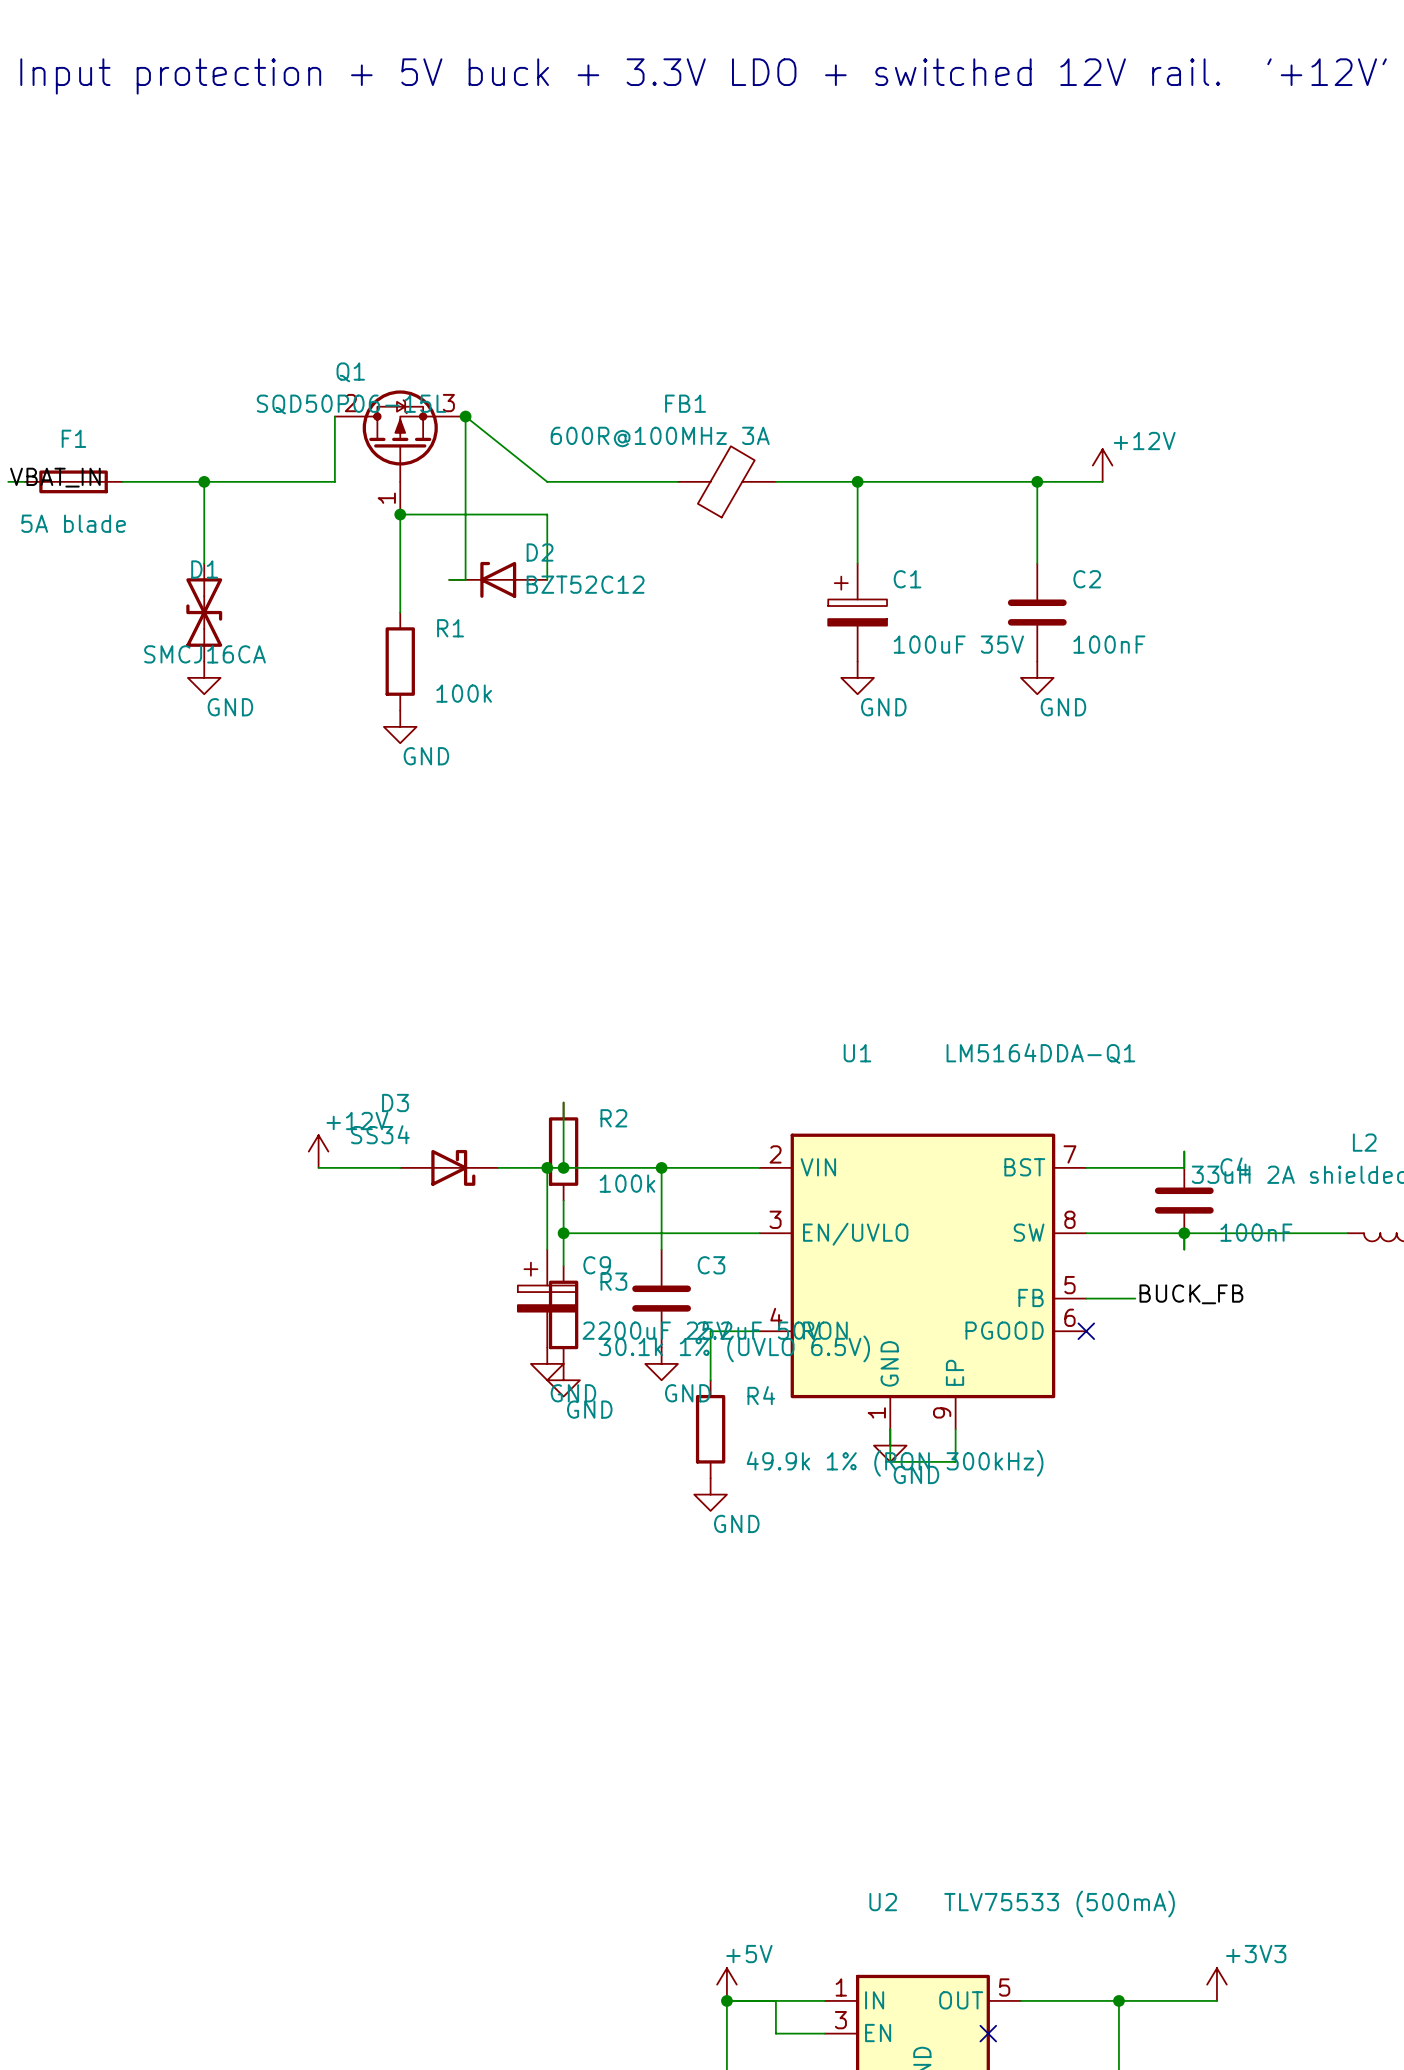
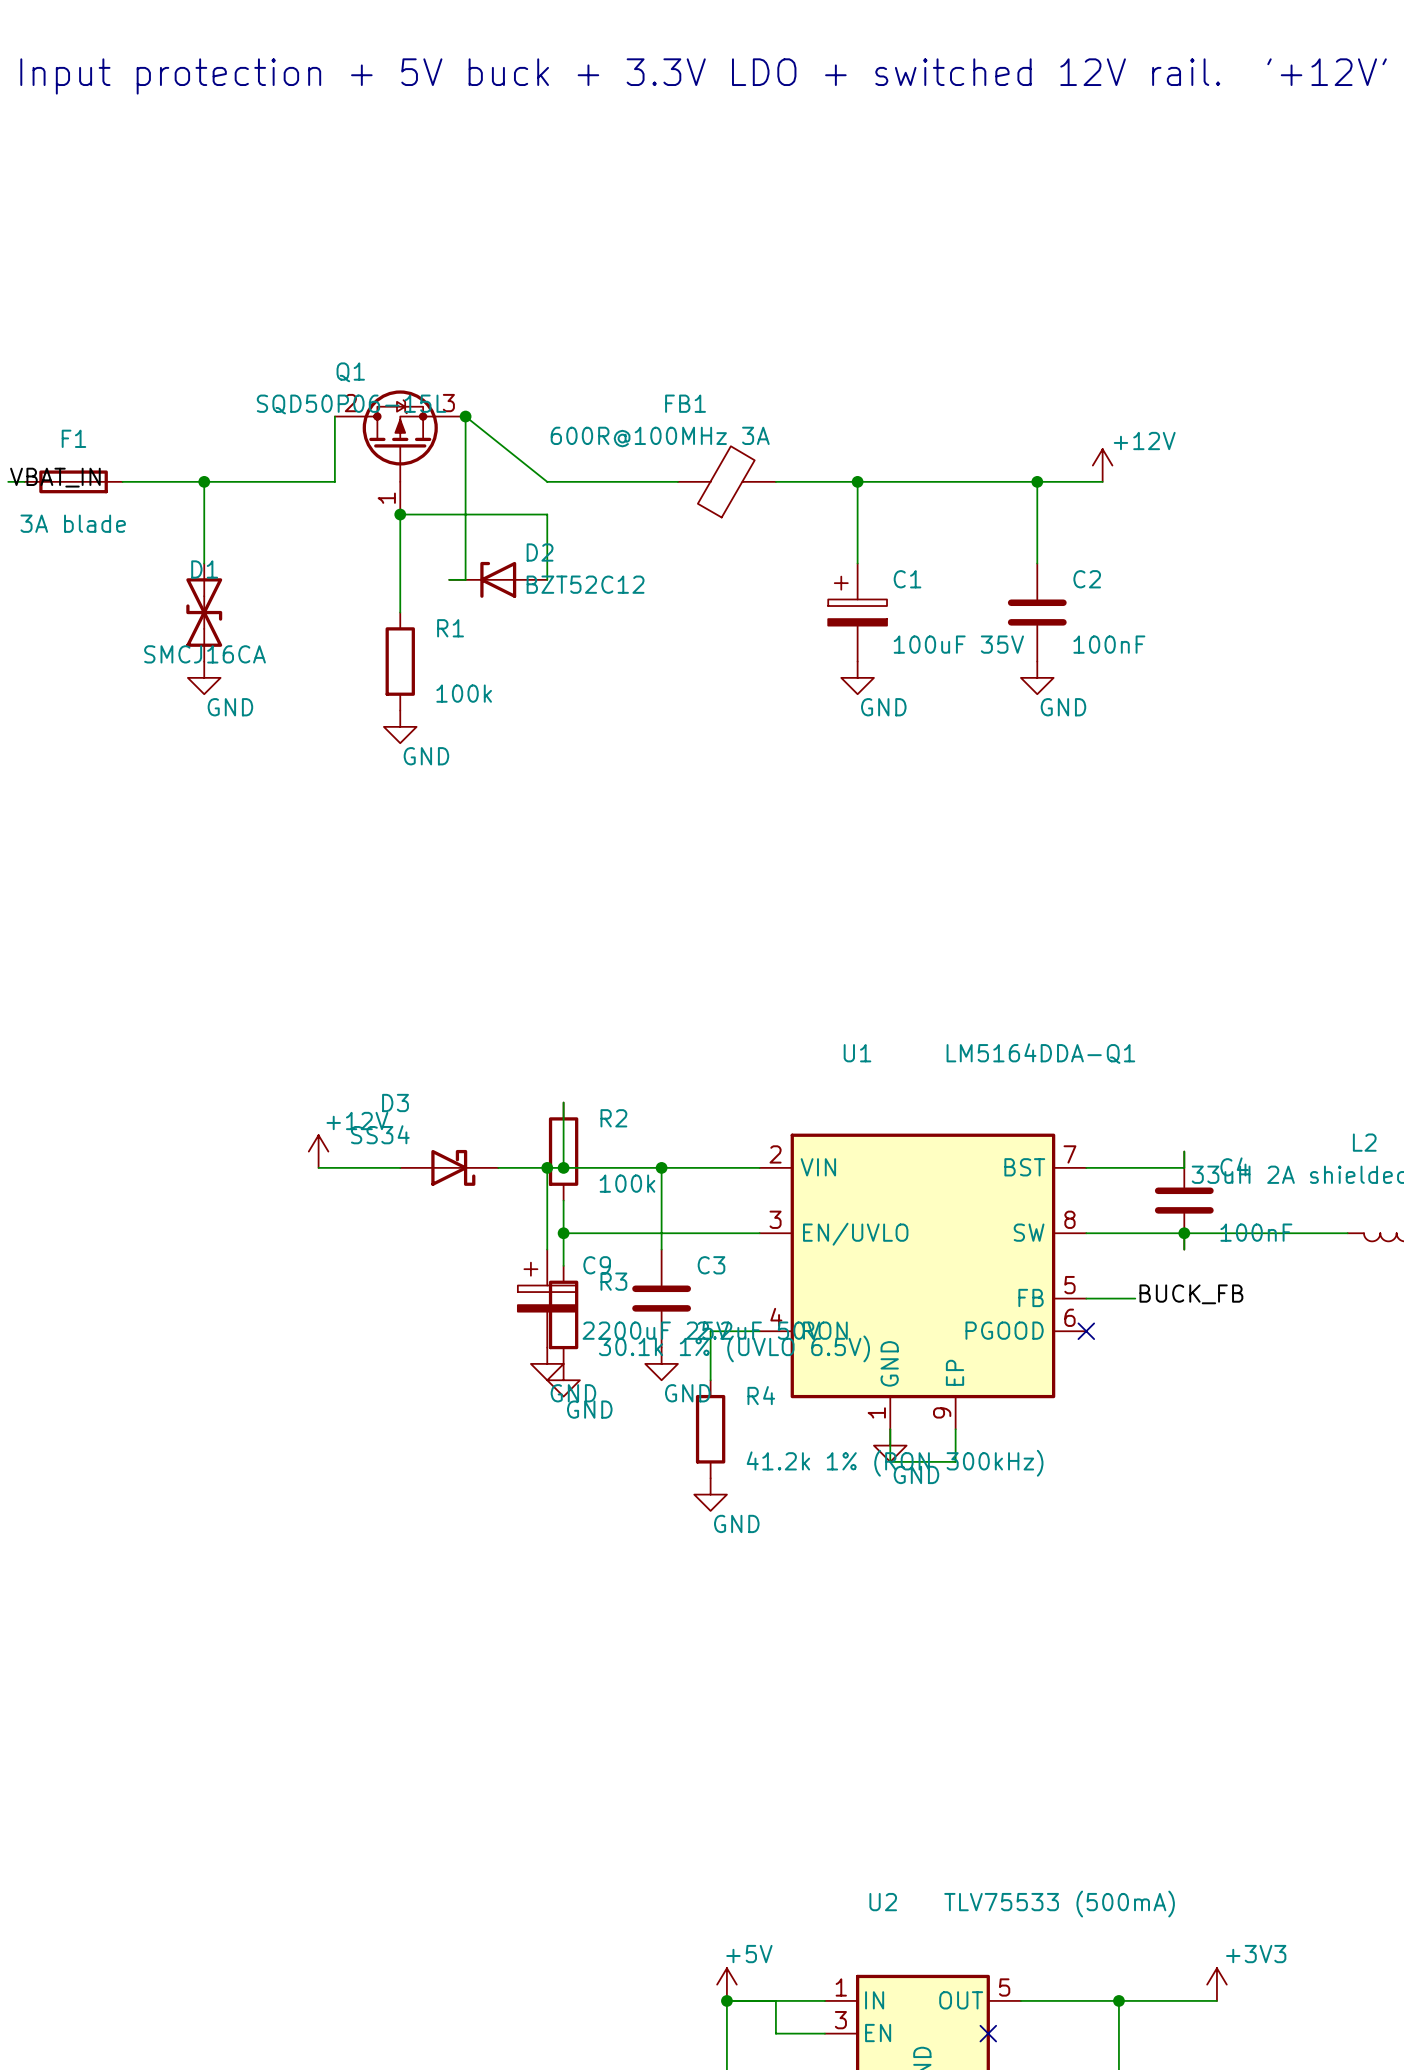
F1 value: 5A blade (73, 523) -> 3A blade (73, 523)
R4 value: 49.9k 1% (RON 300kHz) (895, 1463) -> 41.2k 1% (RON 300kHz) (895, 1463)

